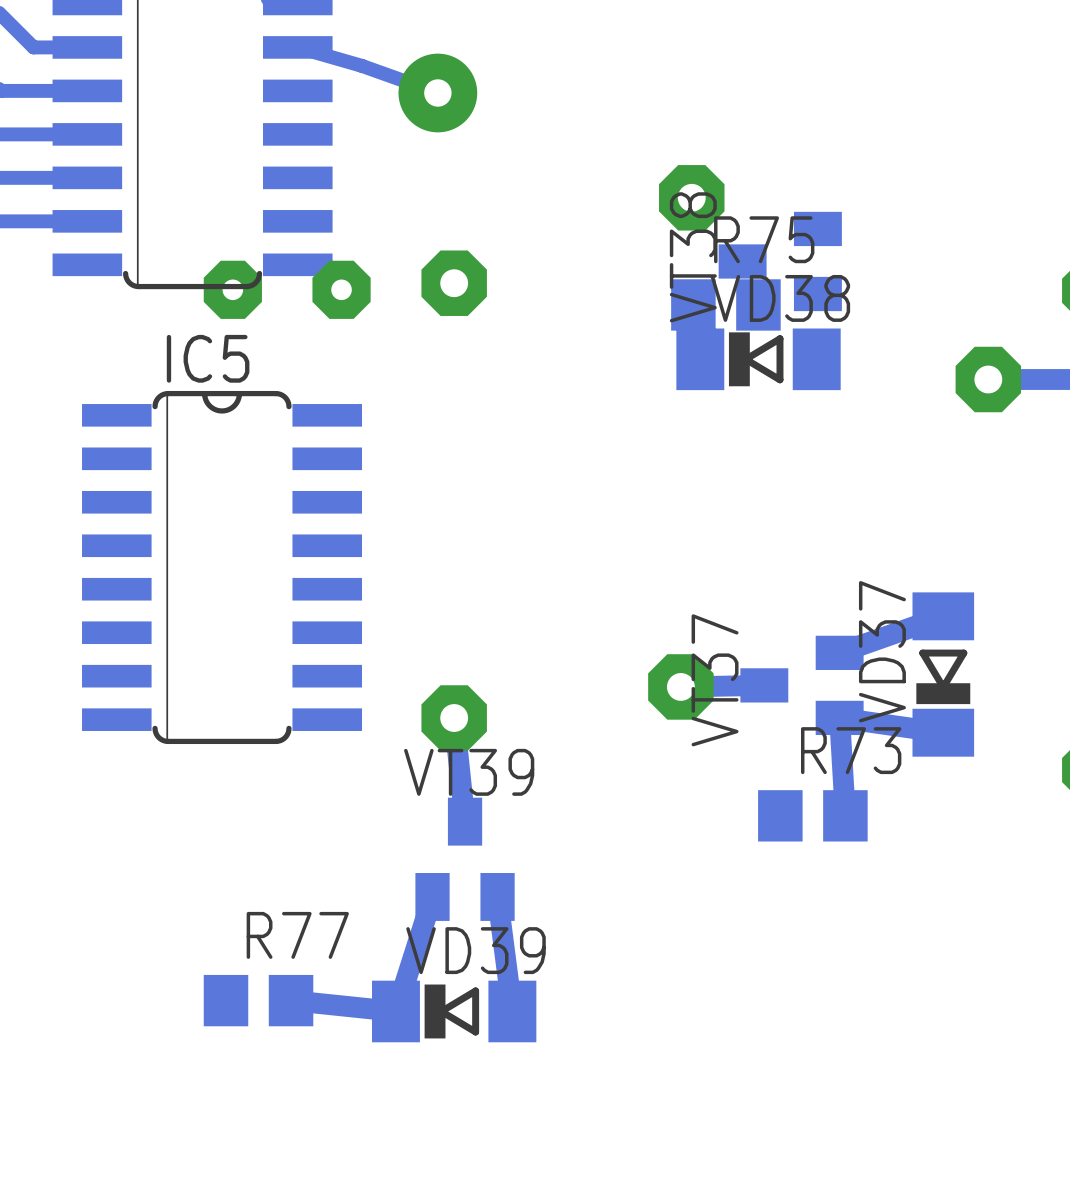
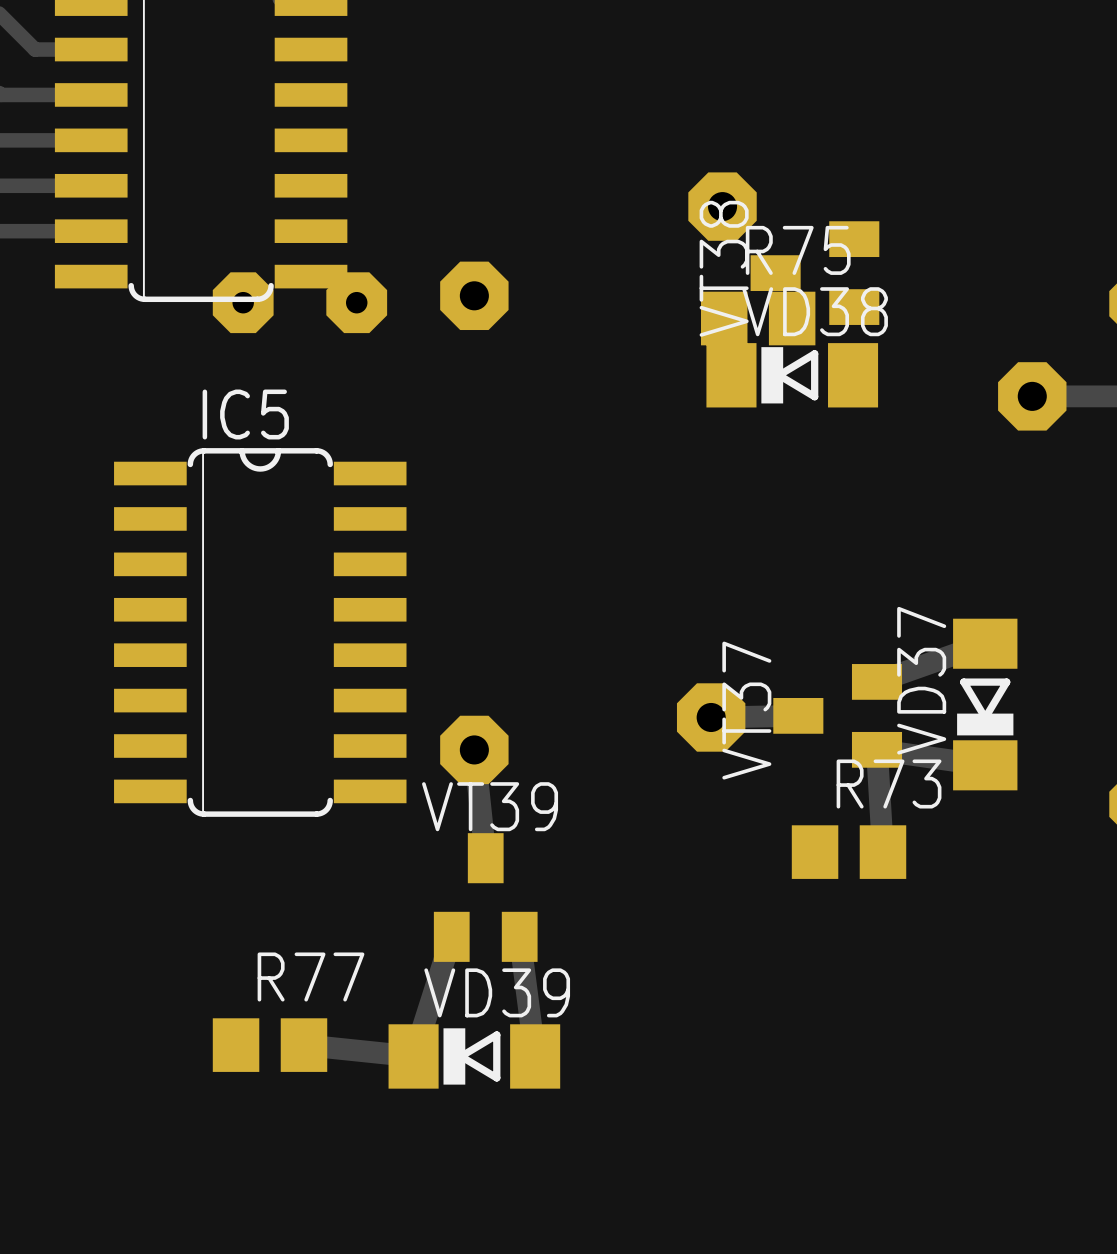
track: (297, 47) (361, 65) (437, 93) -> none
via: (437, 93) -> none
IC5 position: (222, 567) -> (260, 632)

